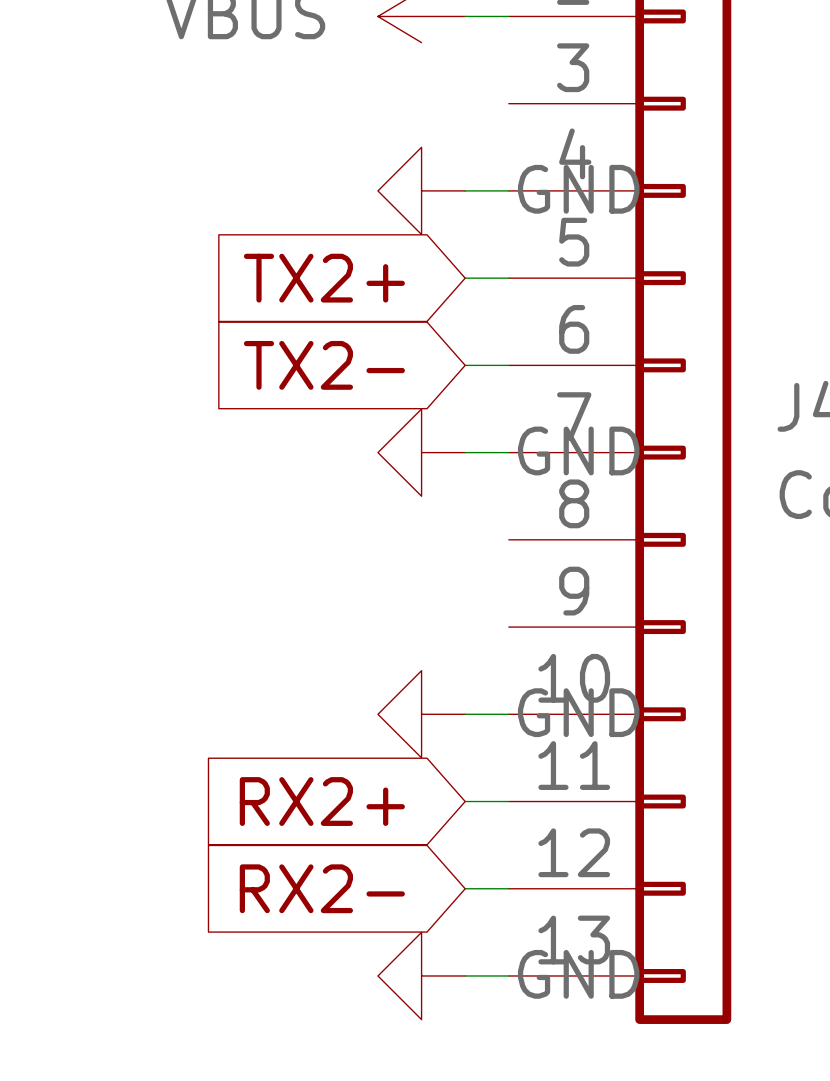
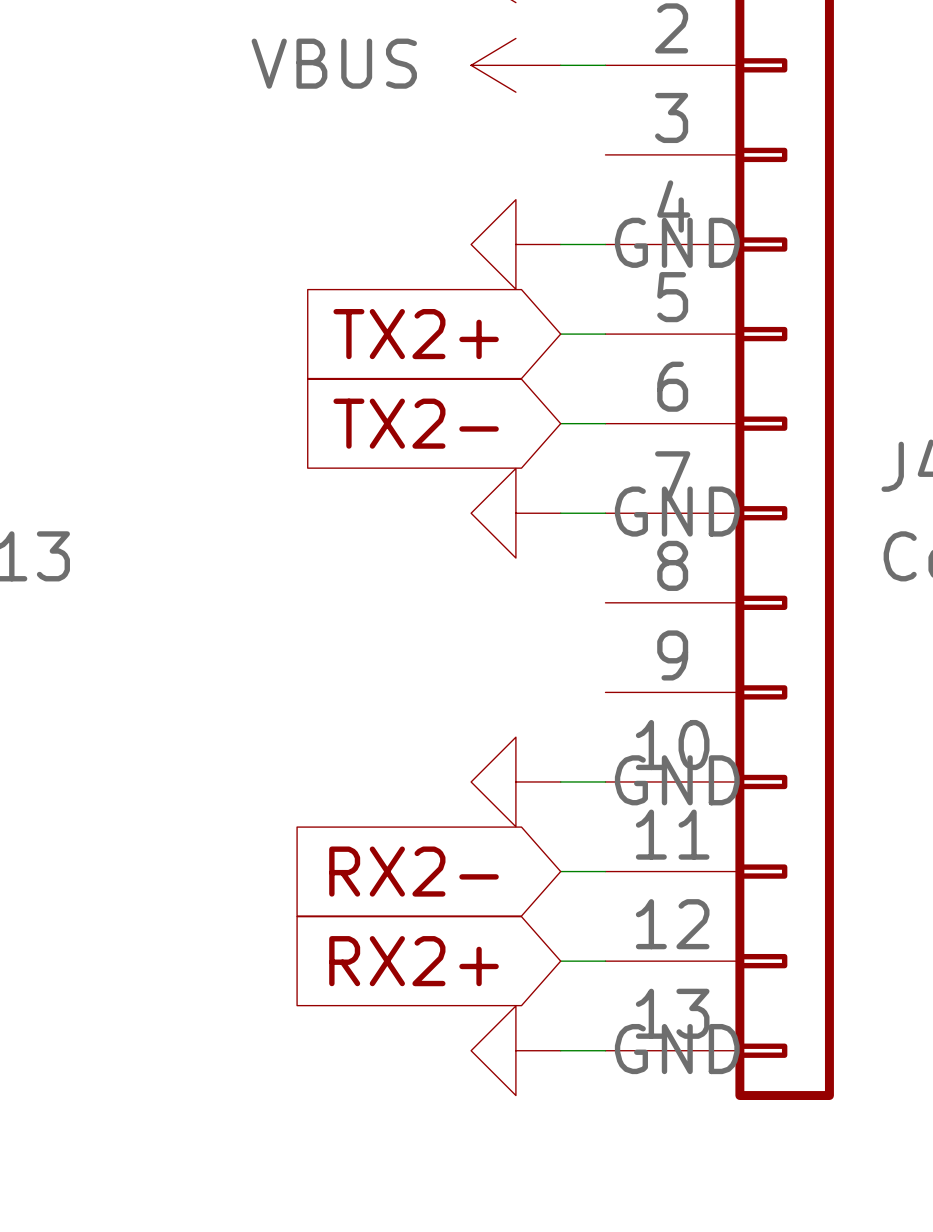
global label: RX2+ (322, 801) -> RX2- (414, 871)
global label: RX2- (322, 888) -> RX2+ (414, 961)

